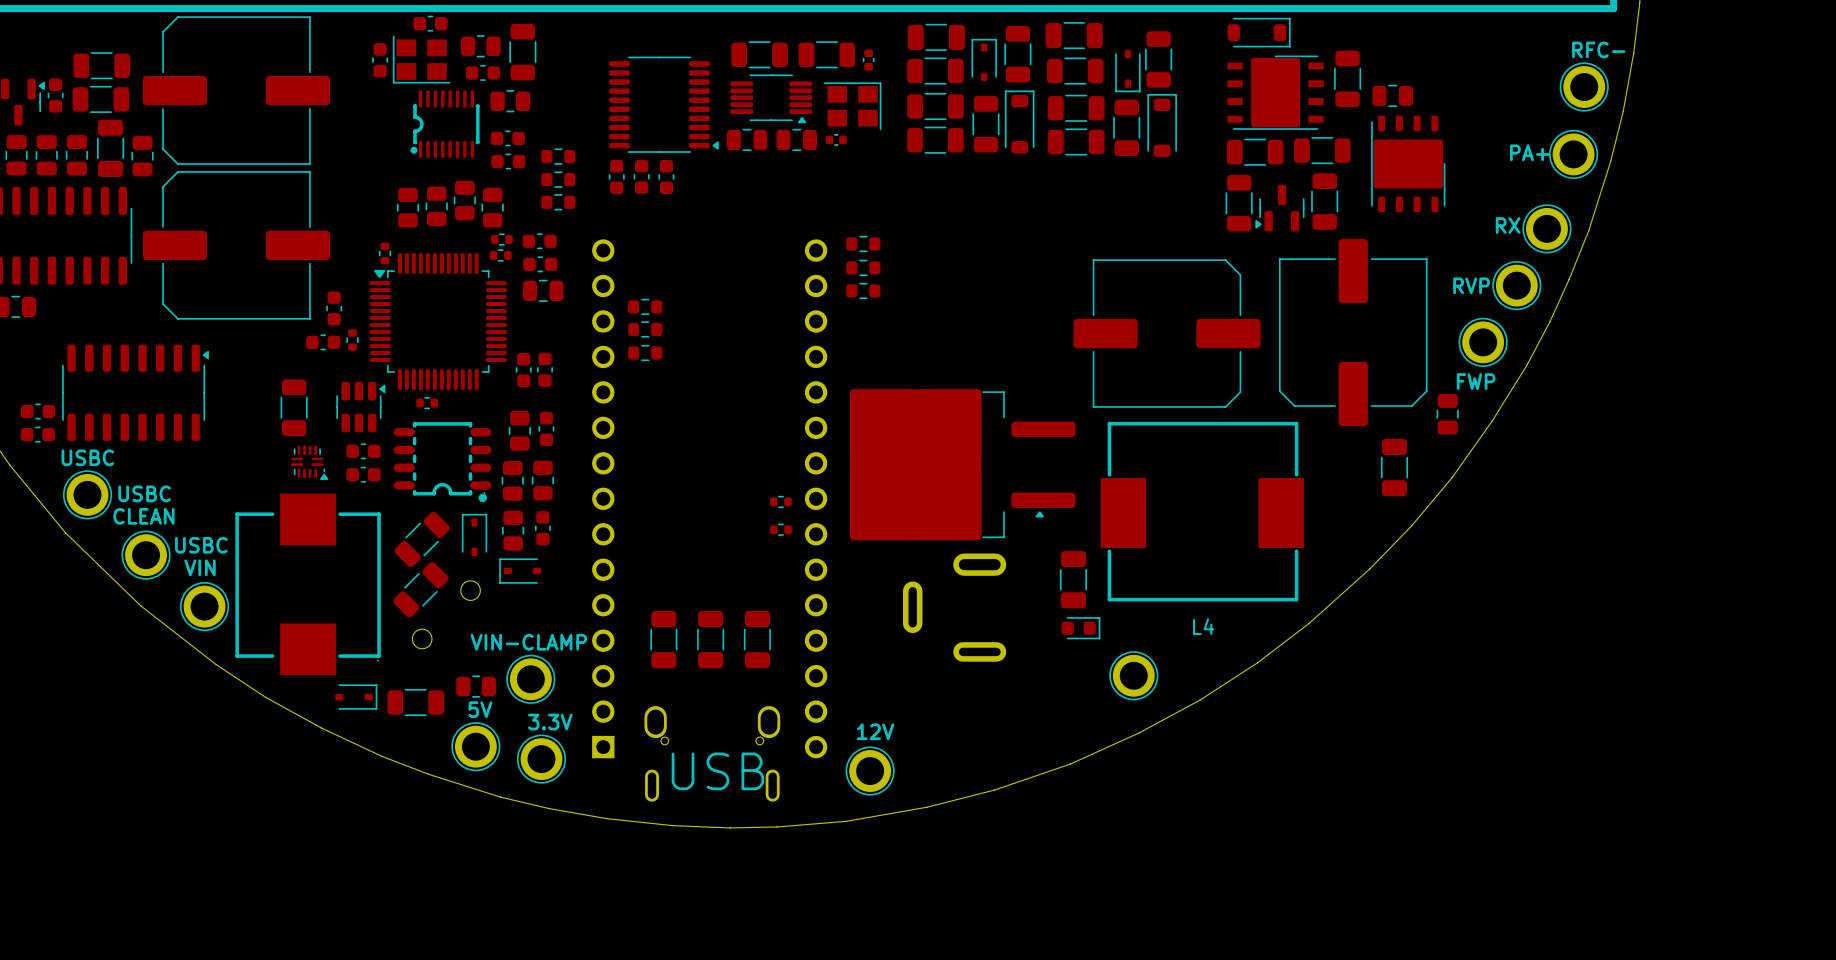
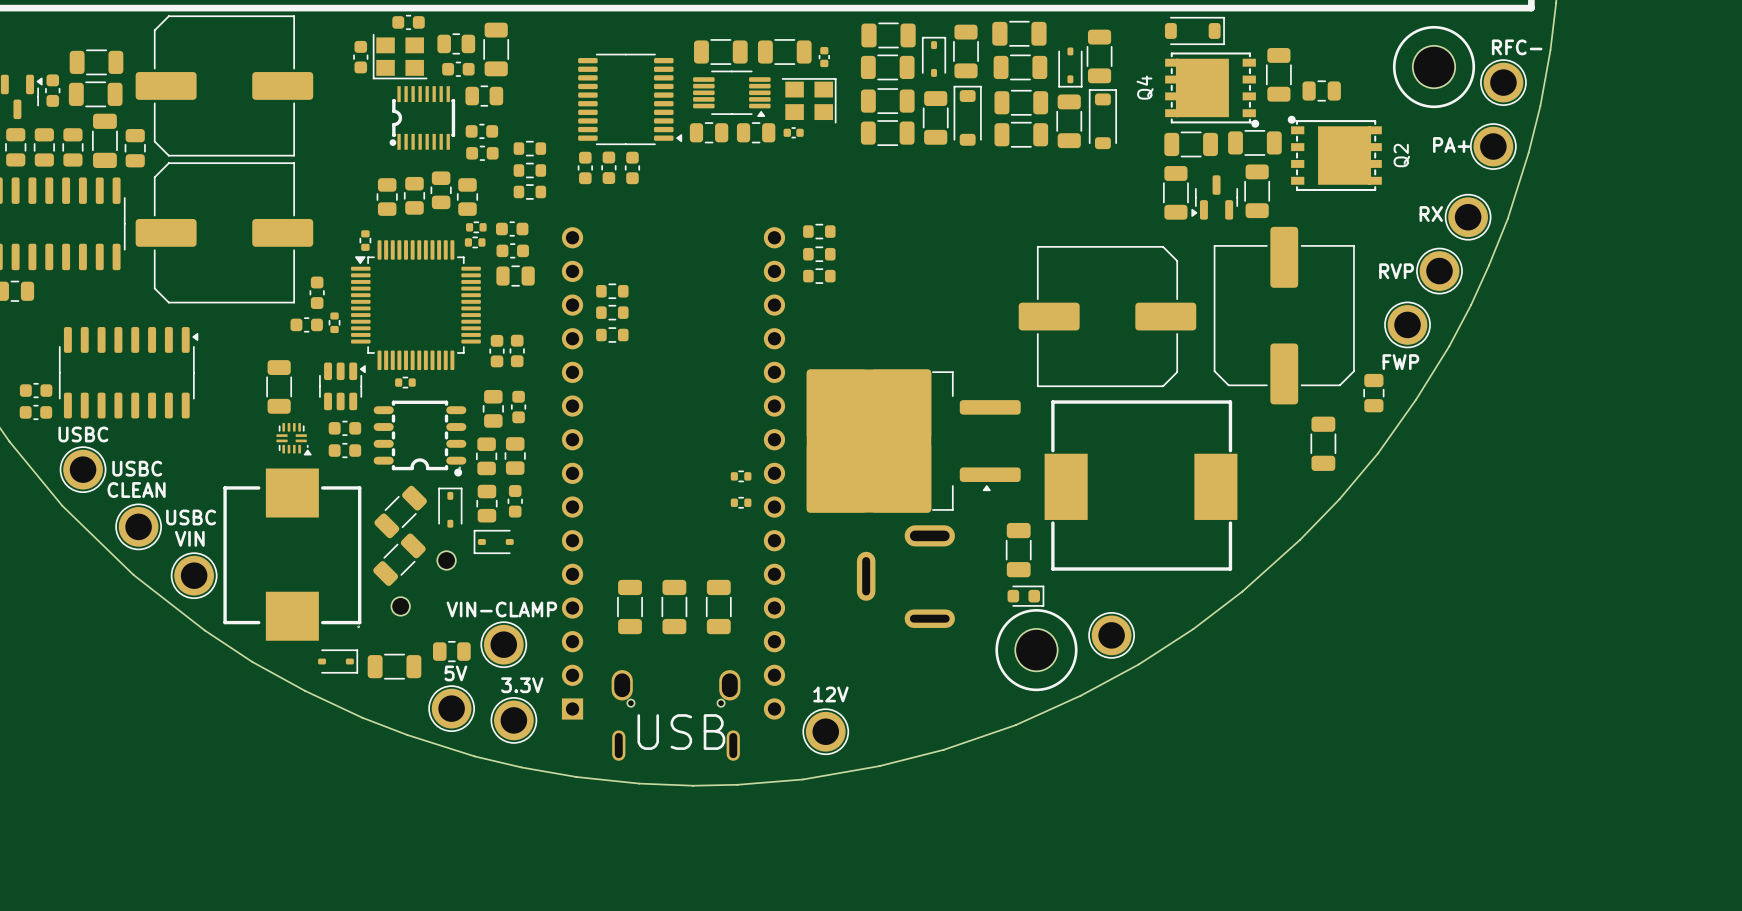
drawing: none -> [1392, 25, 1476, 109]
part: none -> (1434, 67)
part: (1275, 92) -> none
Q4: none -> (1212, 90)
Q2: none -> (1334, 153)
part: (1408, 163) -> none
L4 name: L4 (1203, 626) -> none
drawing: none -> [995, 609, 1078, 692]
part position: (1133, 675) -> (1111, 635)
part: none -> (1036, 650)

